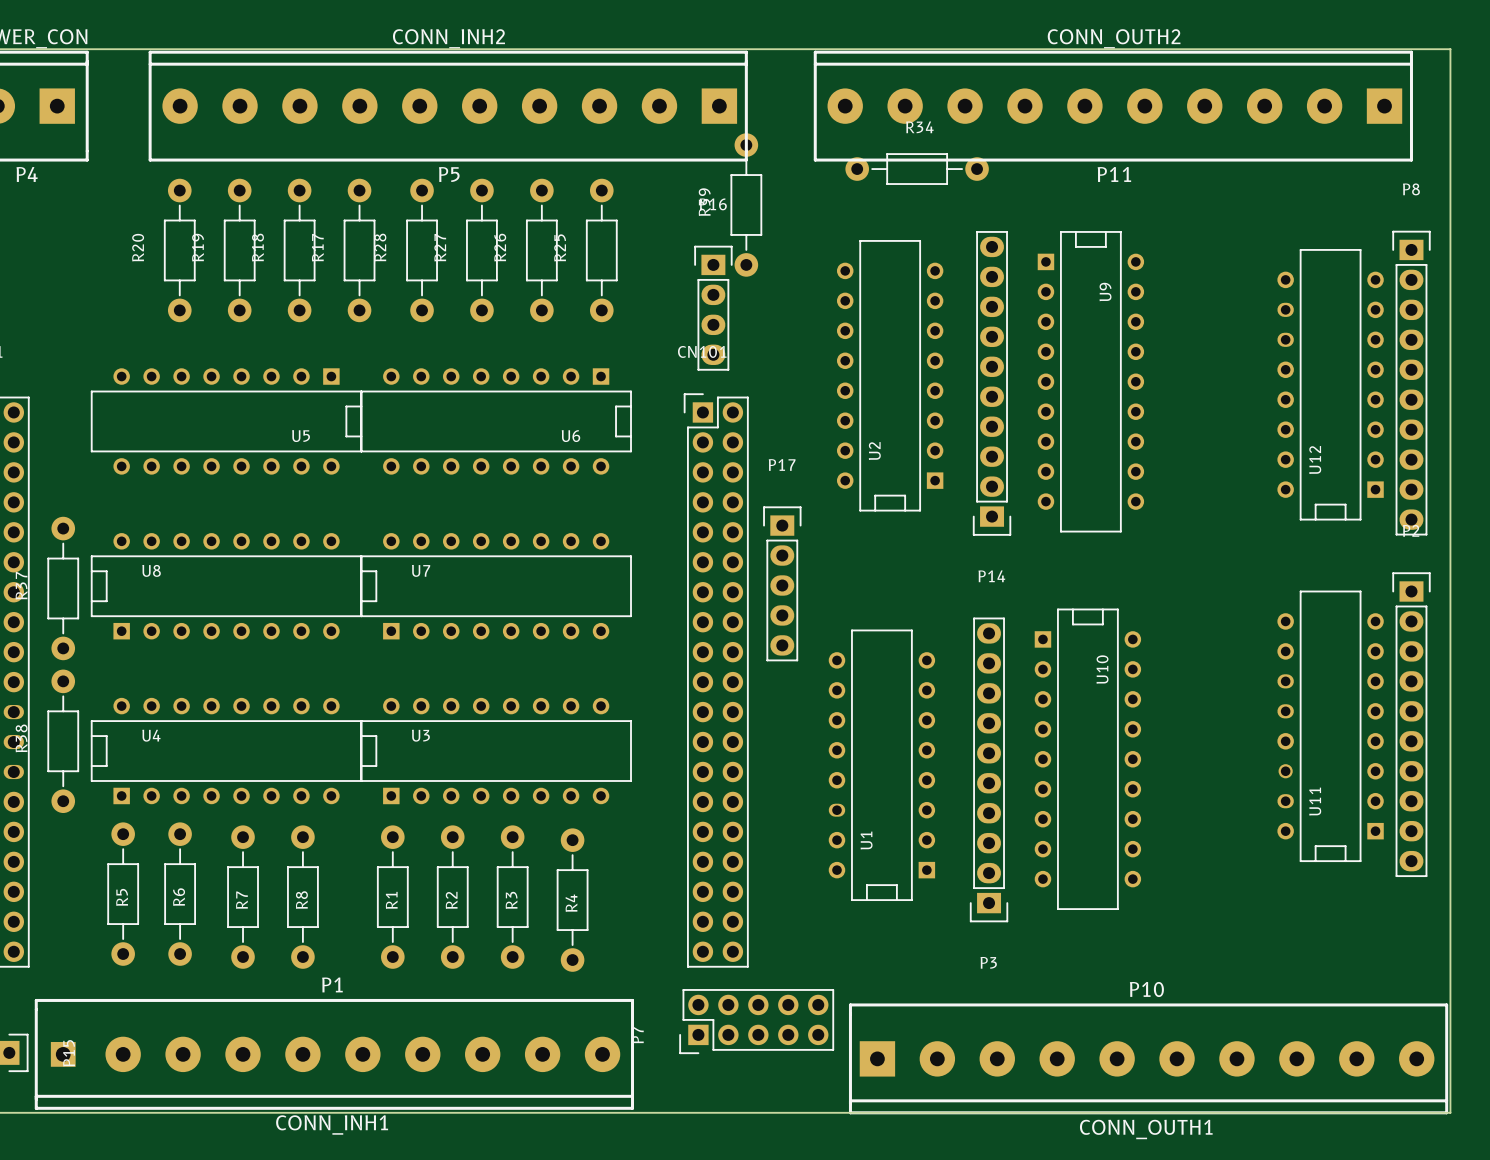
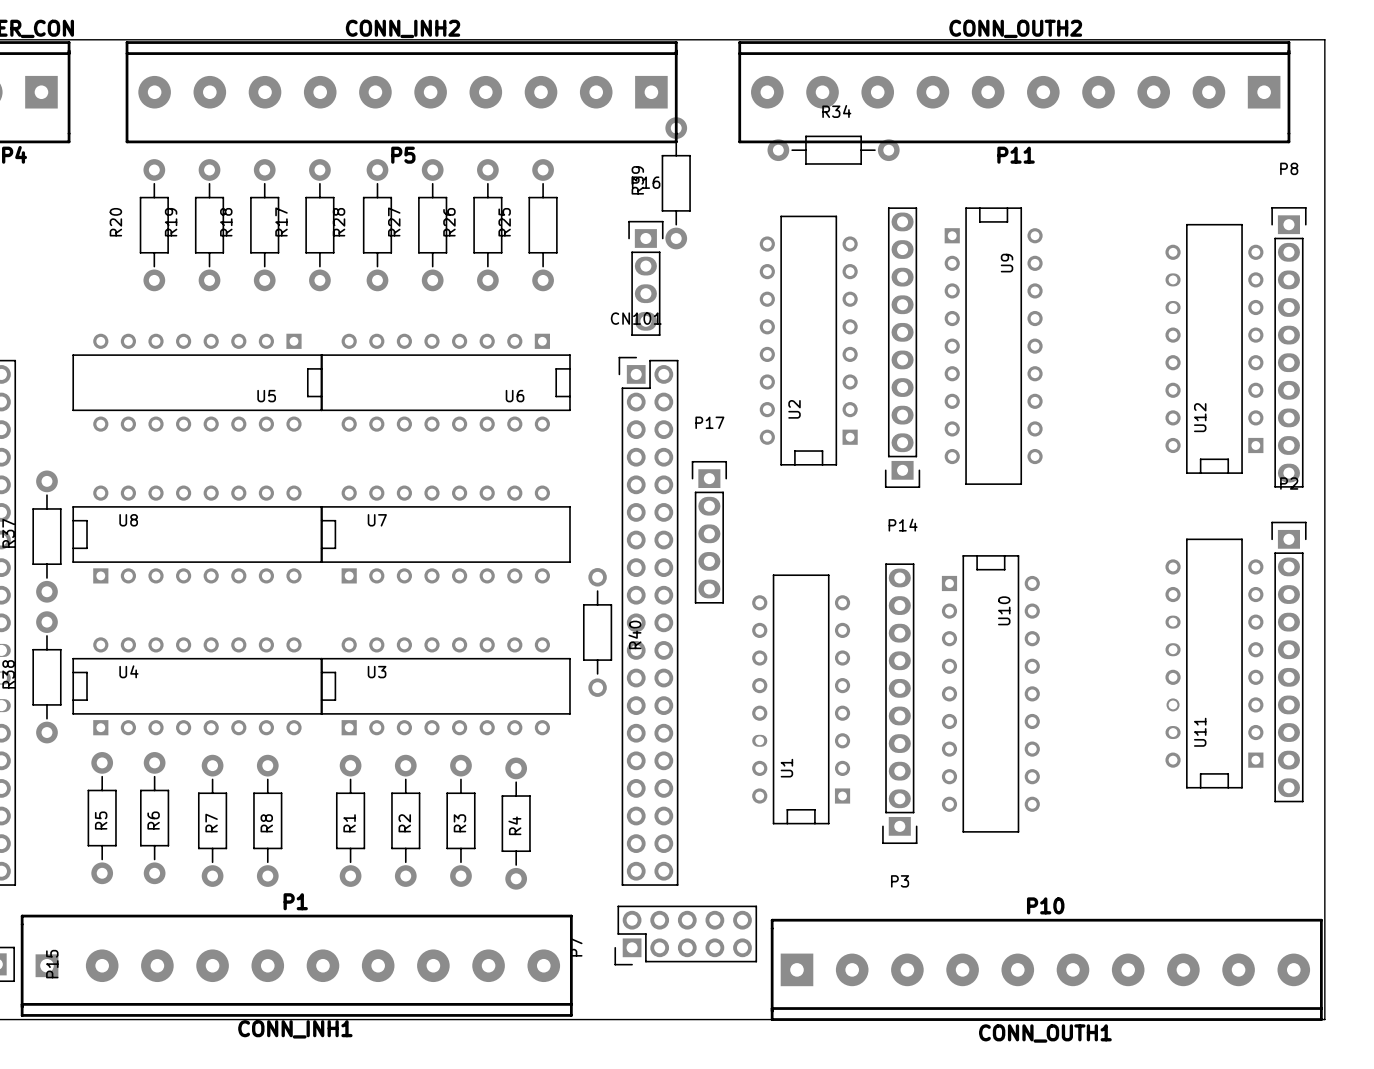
R40: none -> (597, 632)

